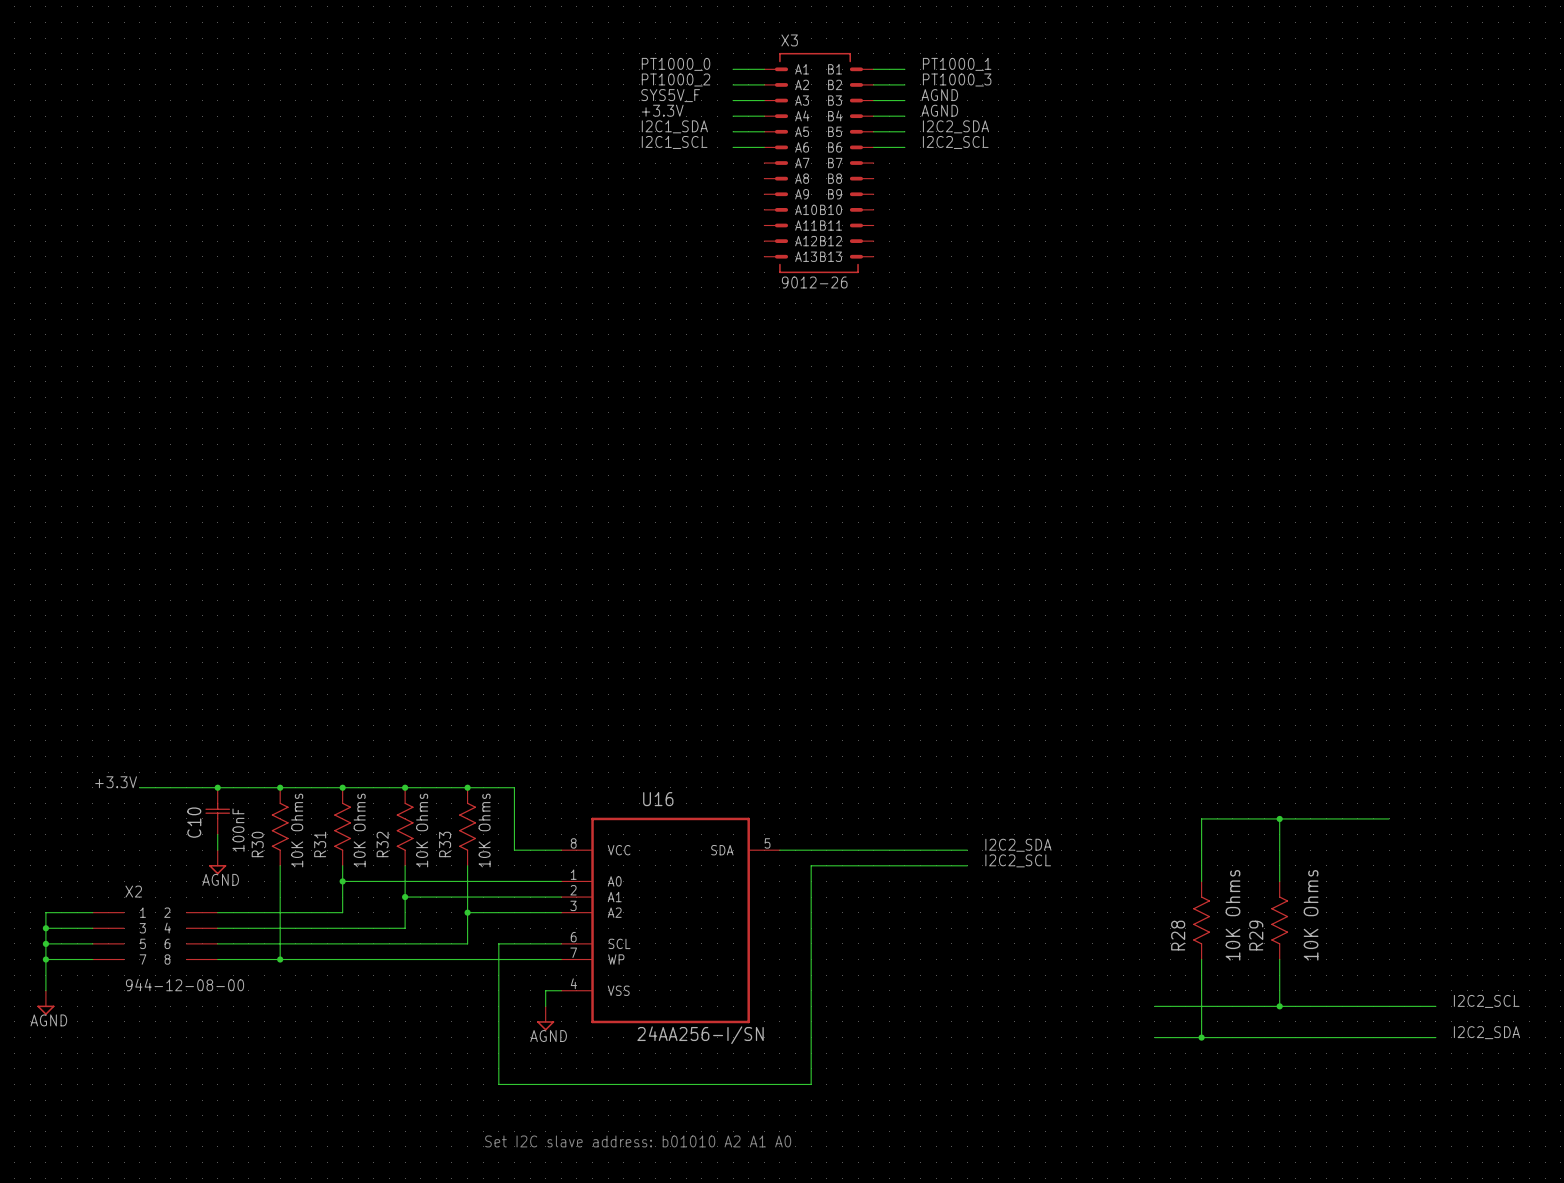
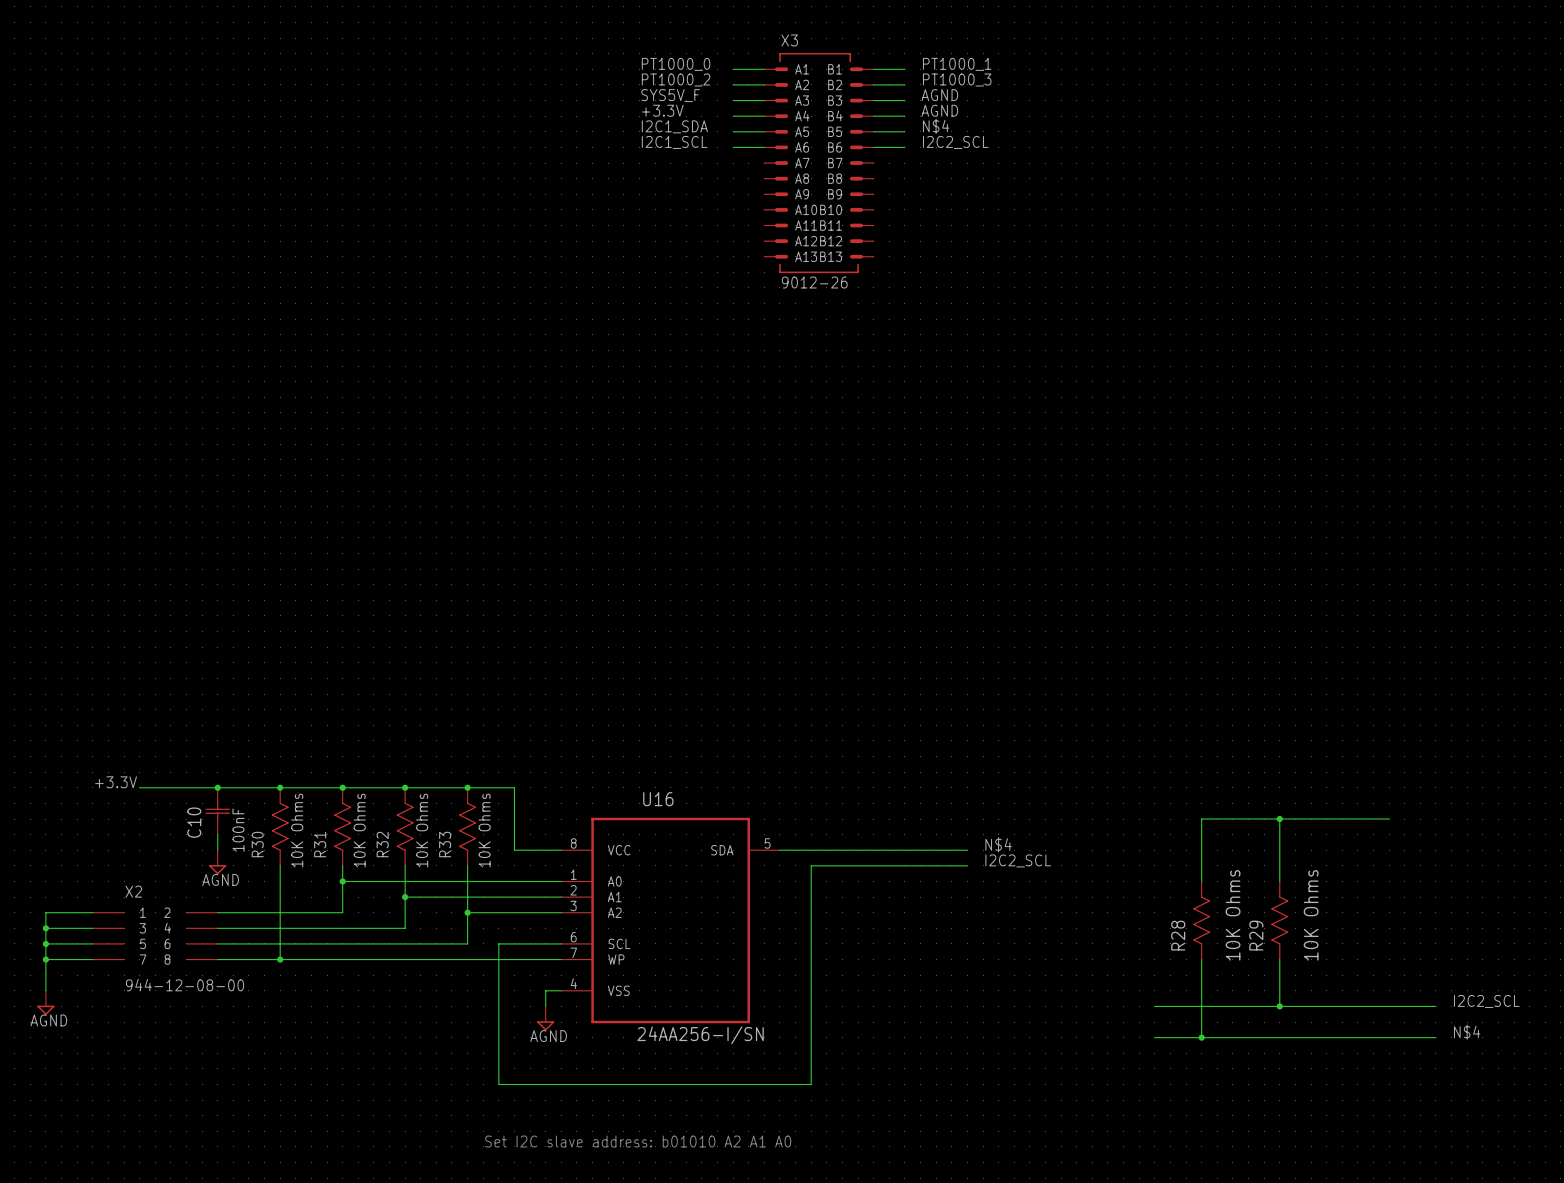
label: I2C2_SDA (955, 126) -> N$4 (936, 126)
label: I2C2_SDA (1018, 845) -> N$4 (998, 844)
label: I2C2_SDA (1486, 1032) -> N$4 (1467, 1032)

